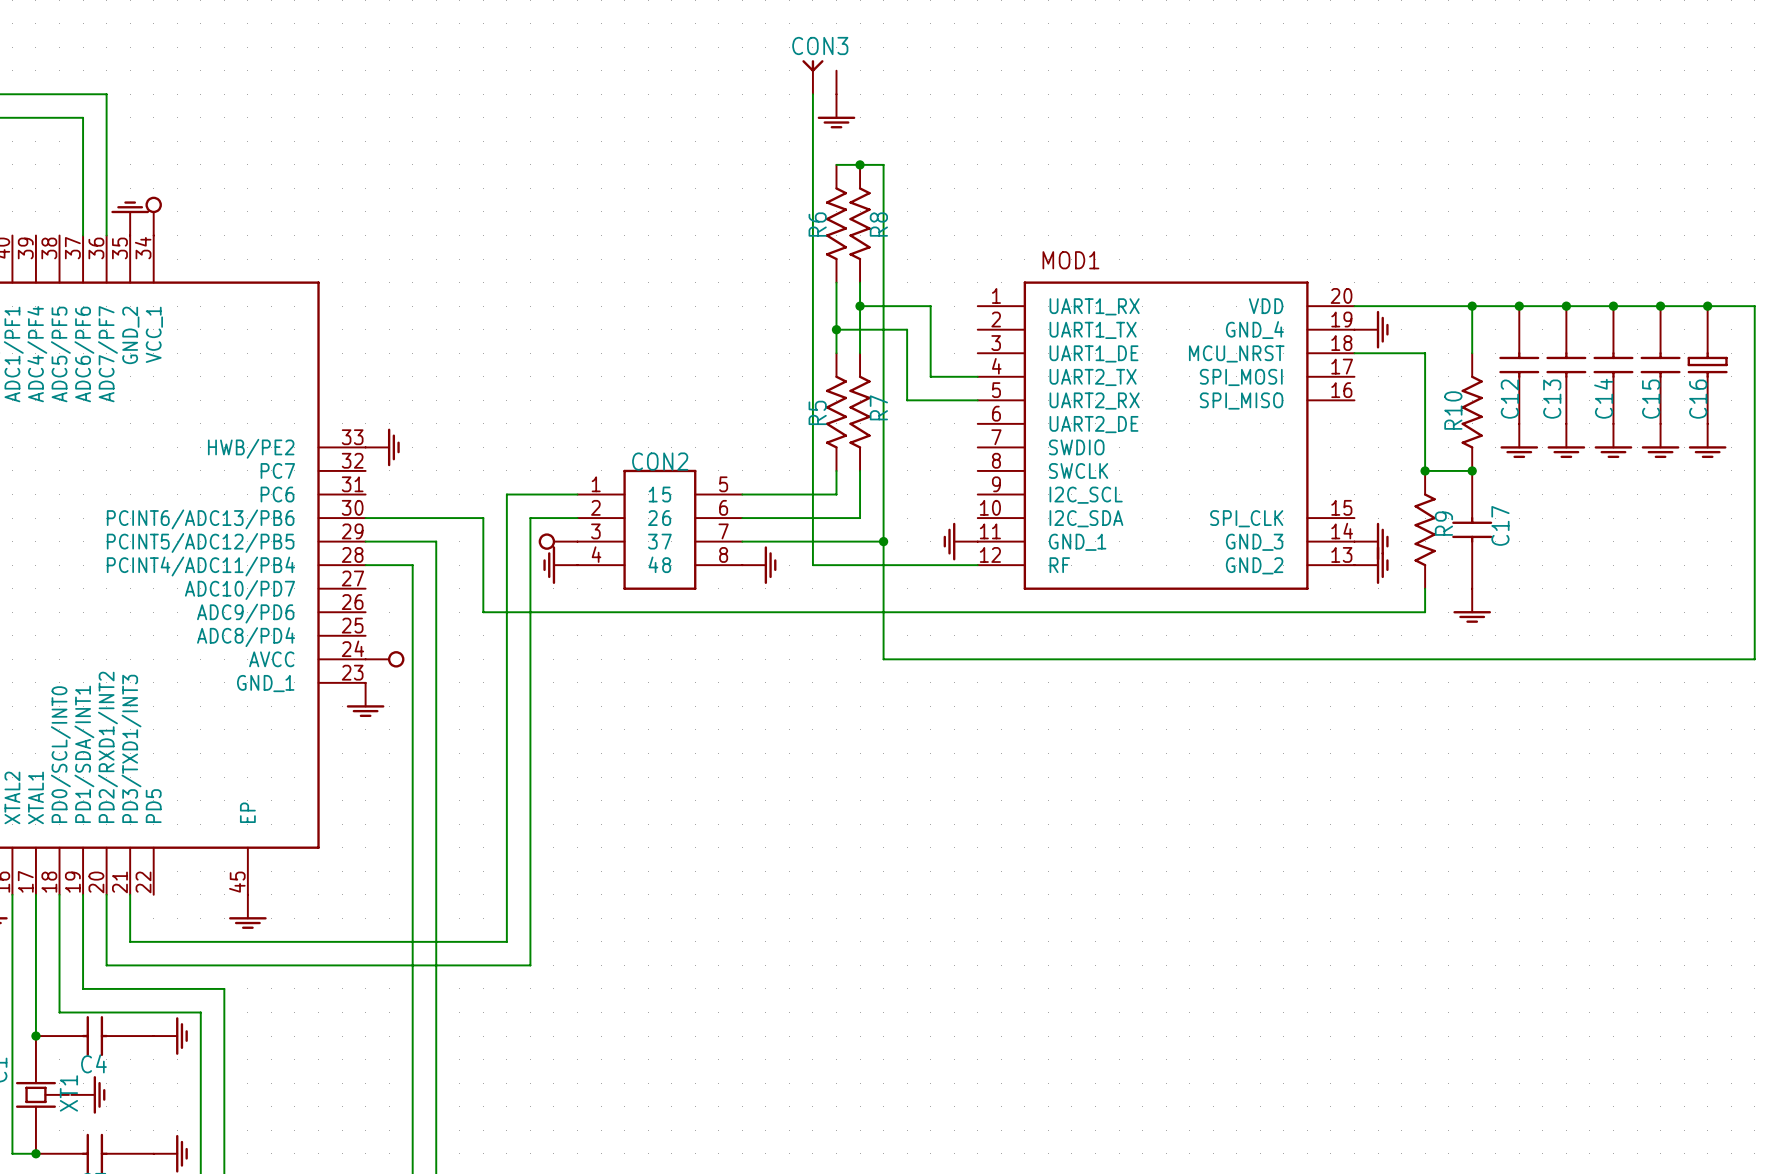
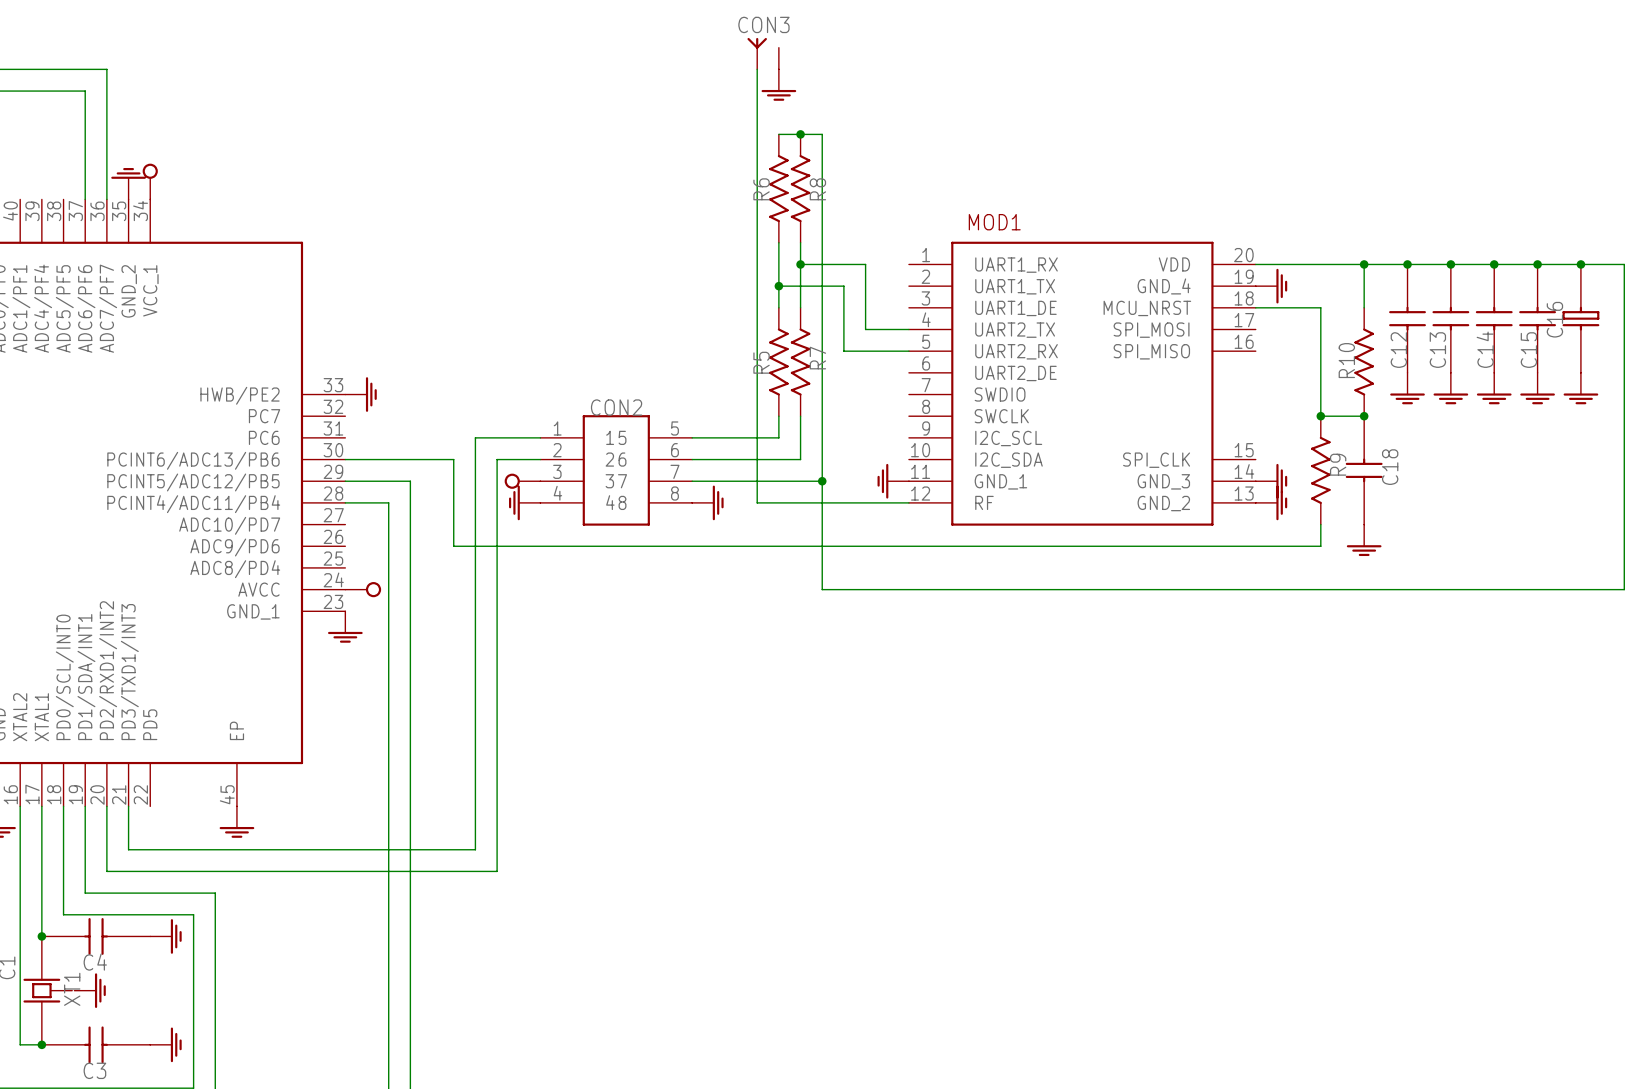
C16 name position: C16 (1698, 399) -> C16 (1554, 319)
C17 name: C17 (1500, 525) -> C18 (1390, 467)

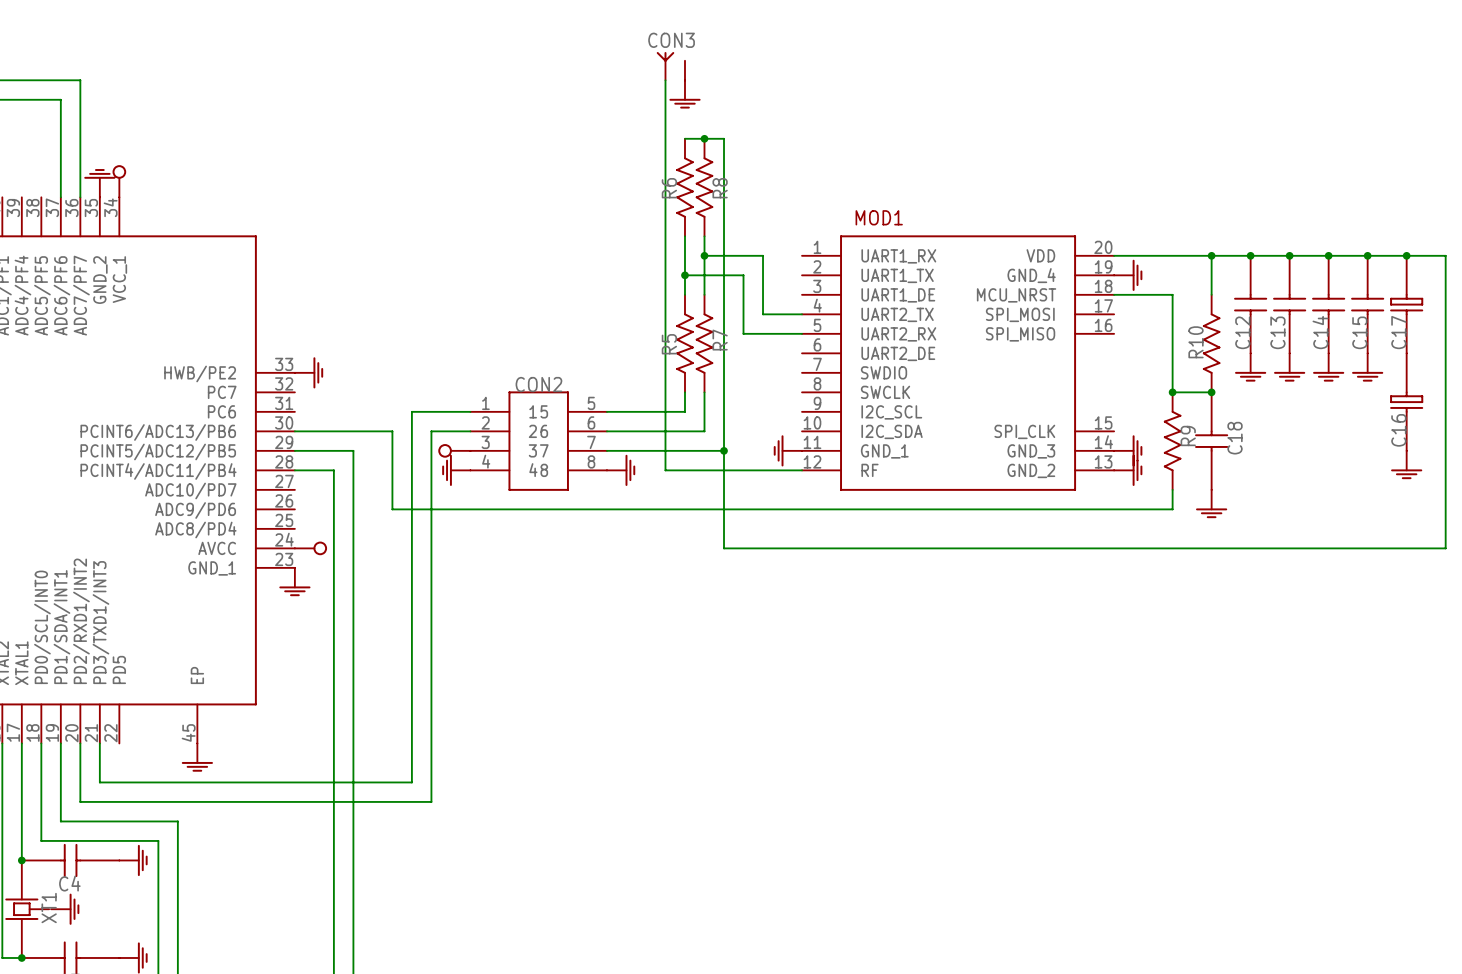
C16 name: C16 (1554, 319) -> C17 (1398, 332)
power symbol position: (1580, 388) -> (1406, 465)
C16: none -> (1406, 402)

